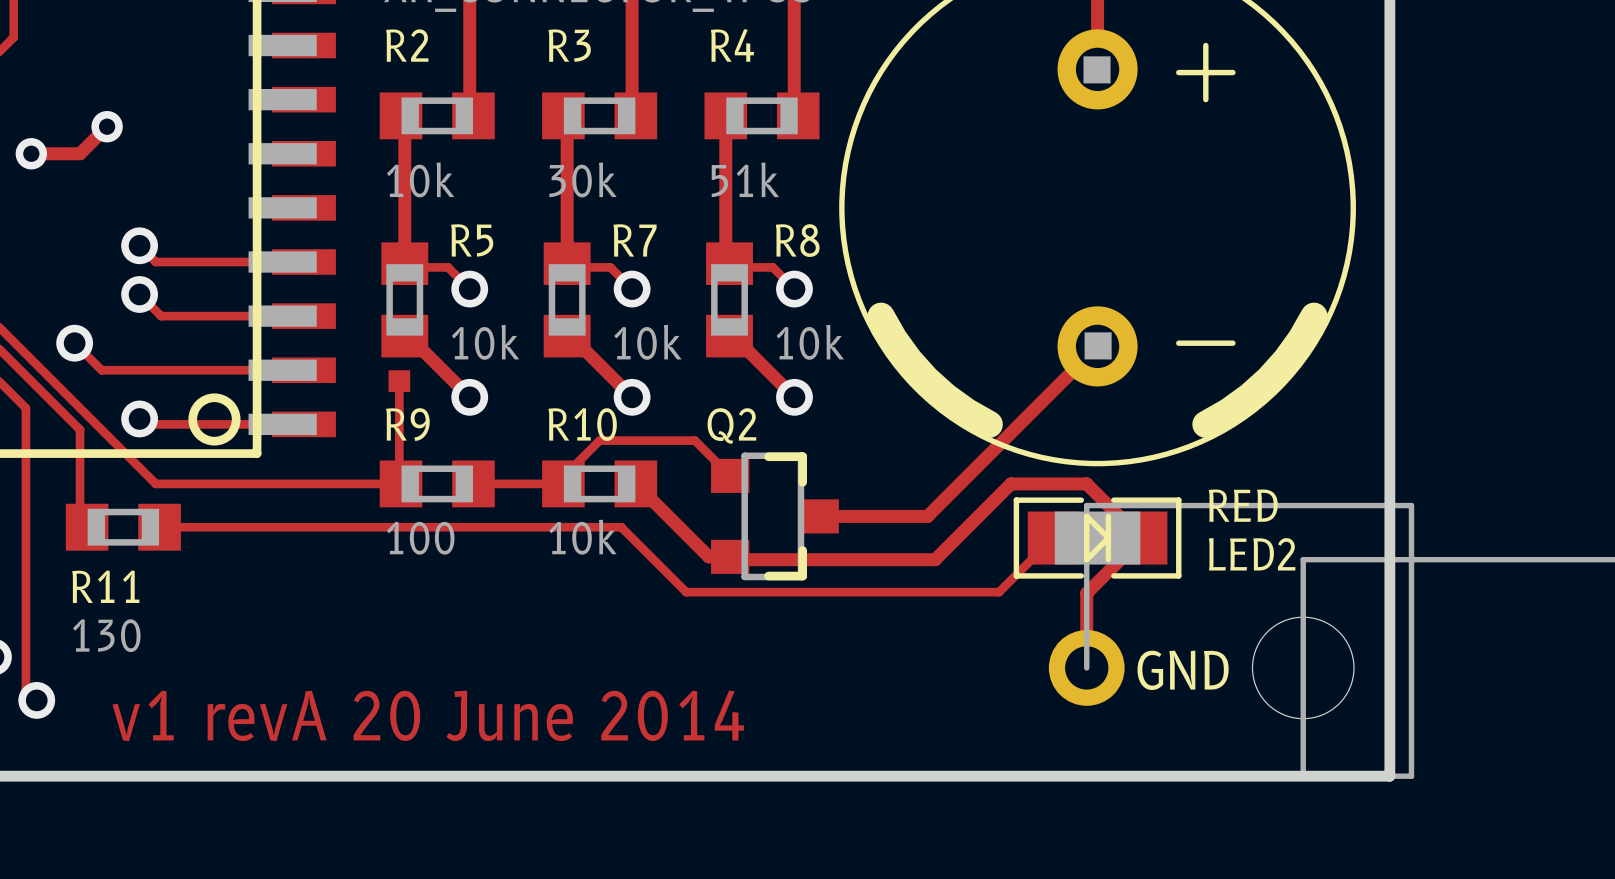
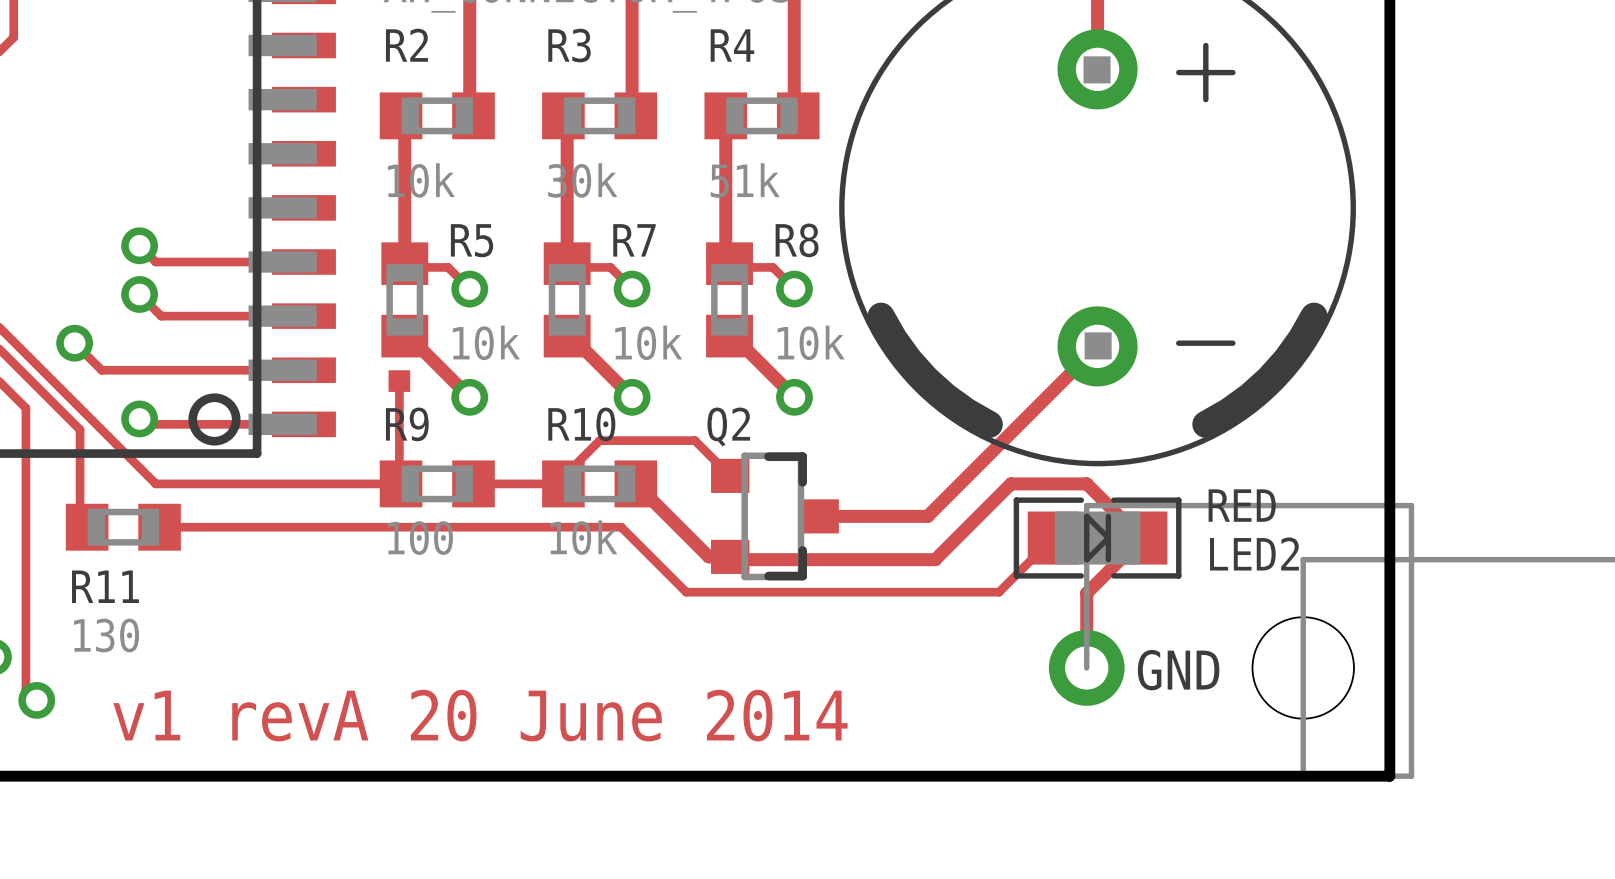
track: (107, 126) (80, 153) (31, 153) -> none
via: (107, 126) -> none
via: (31, 153) -> none

